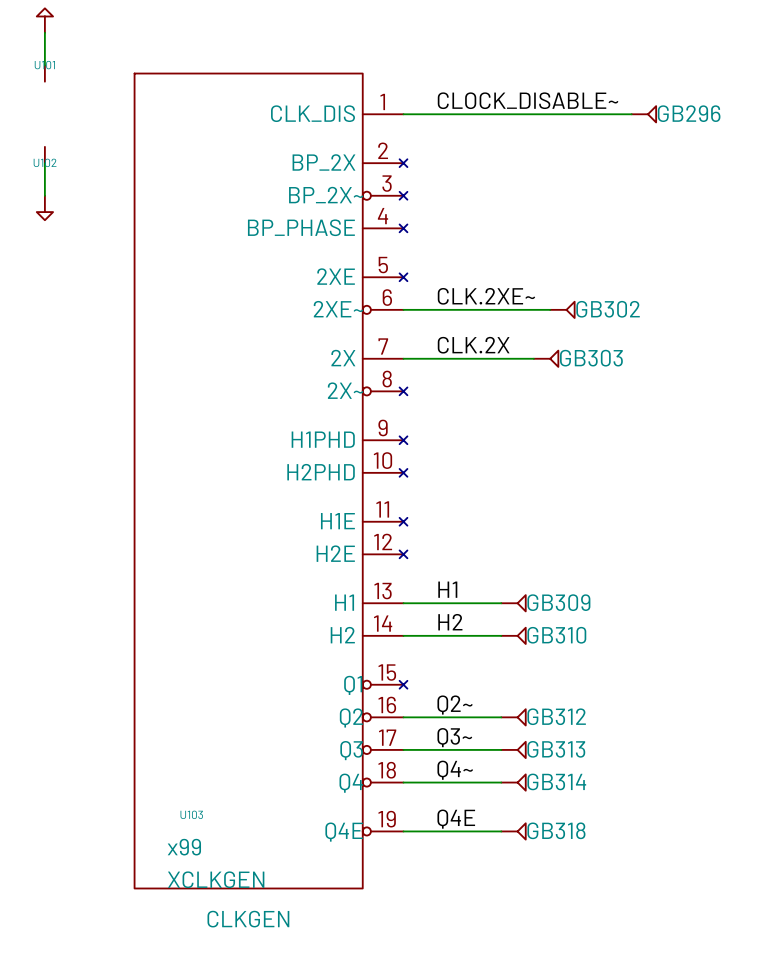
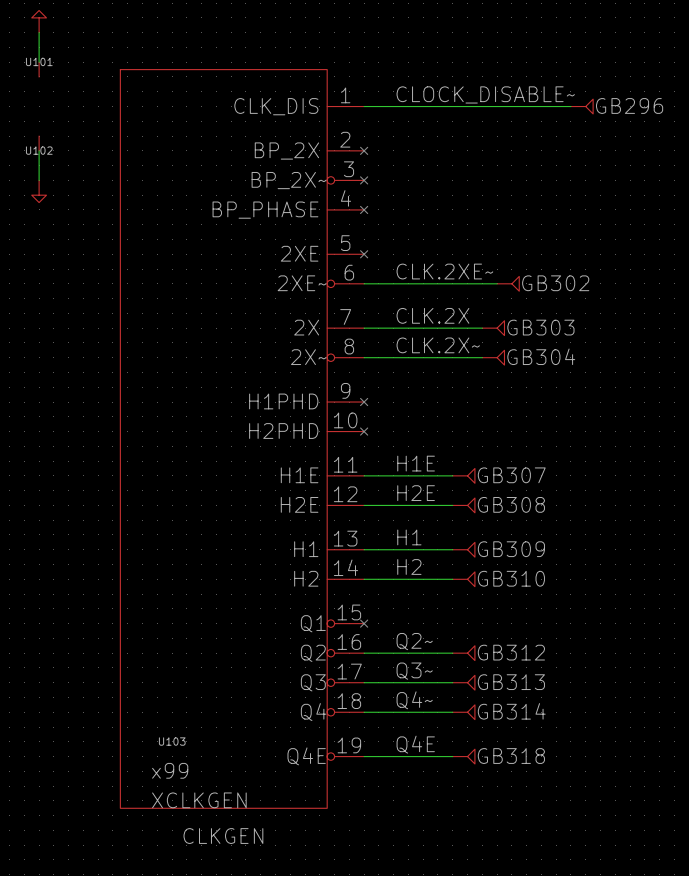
label: none -> CLK.2X~ (438, 345)
wire: none -> (364, 357) (482, 357)
no-connect mark: (403, 391) -> none
GB304: none -> (493, 357)
label: none -> H1E (416, 463)
wire: none -> (364, 475) (452, 475)
no-connect mark: (403, 521) -> none
GB307: none -> (464, 475)
label: none -> H2E (416, 493)
wire: none -> (364, 505) (452, 505)
no-connect mark: (403, 554) -> none
GB308: none -> (464, 505)

